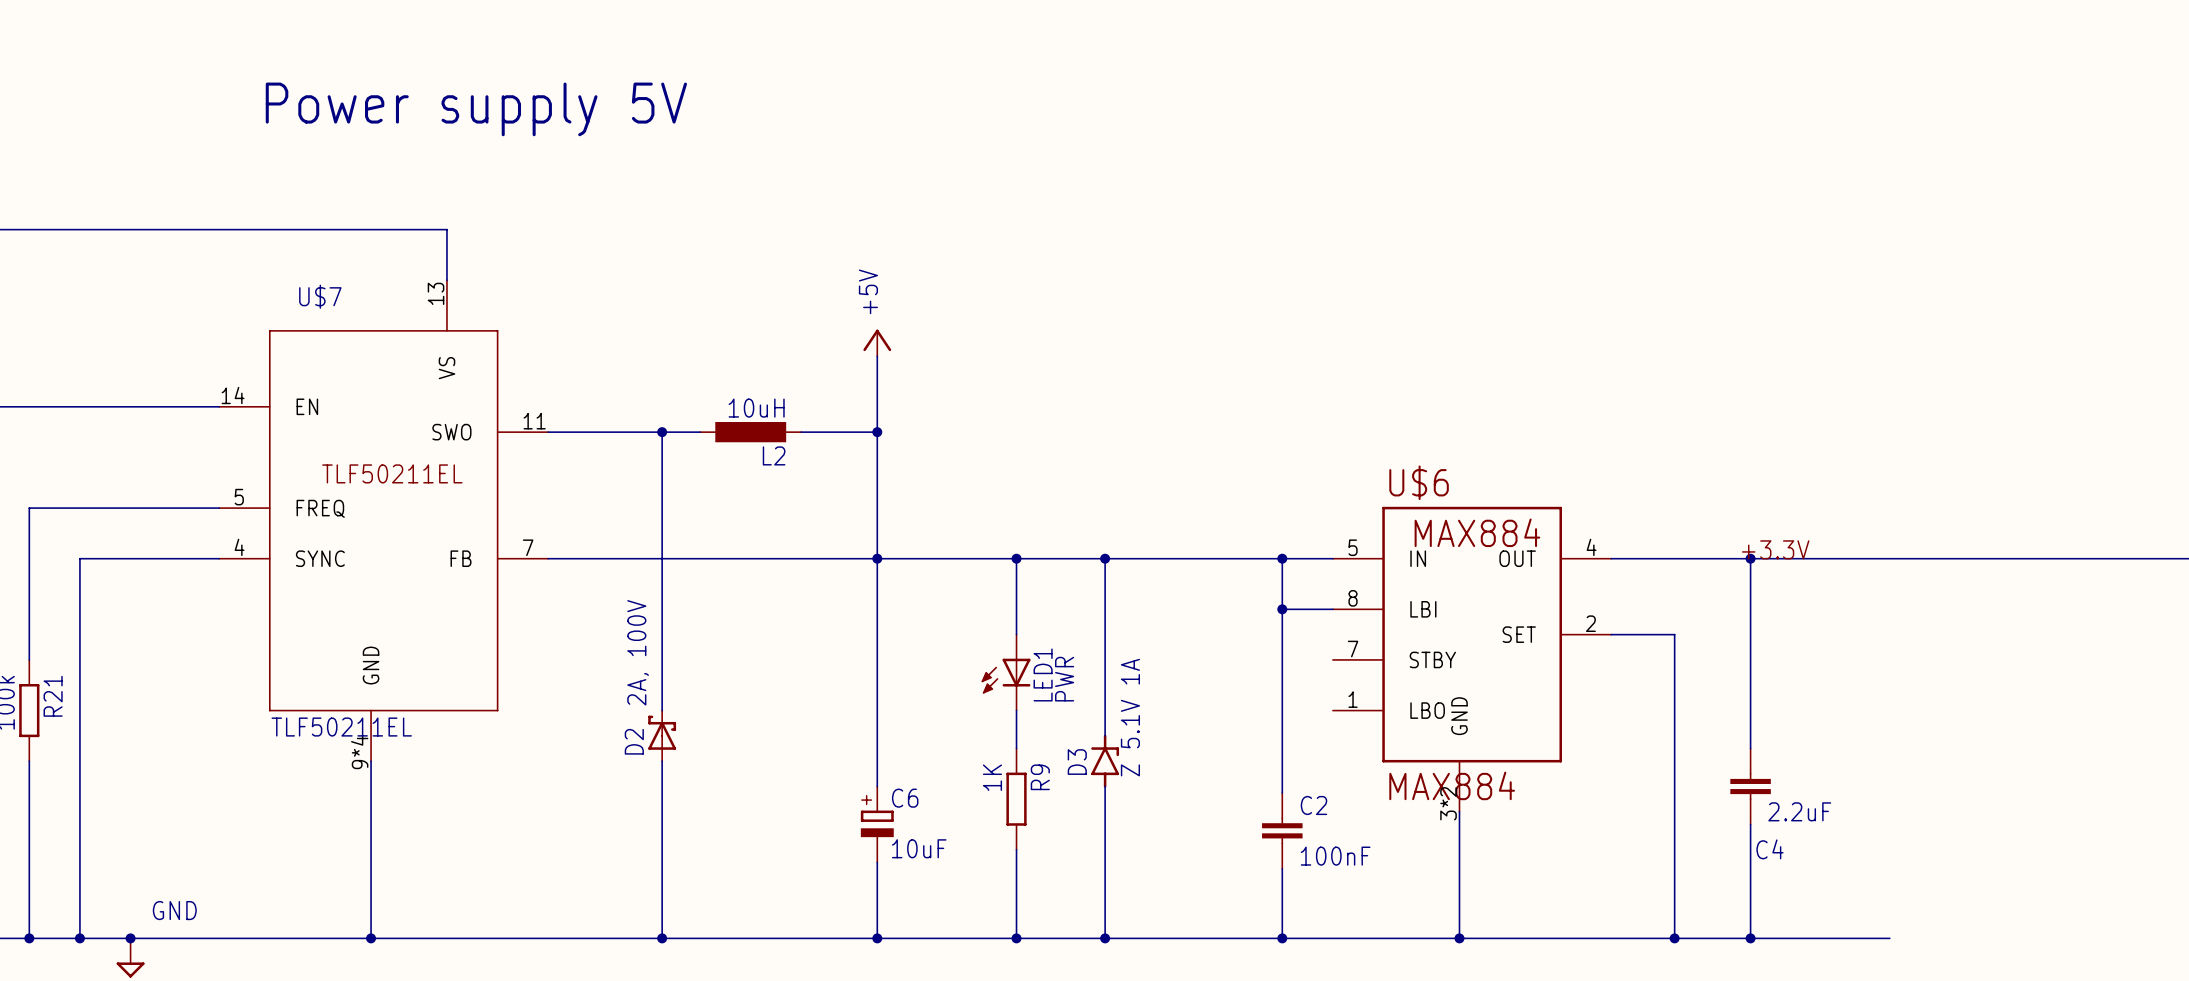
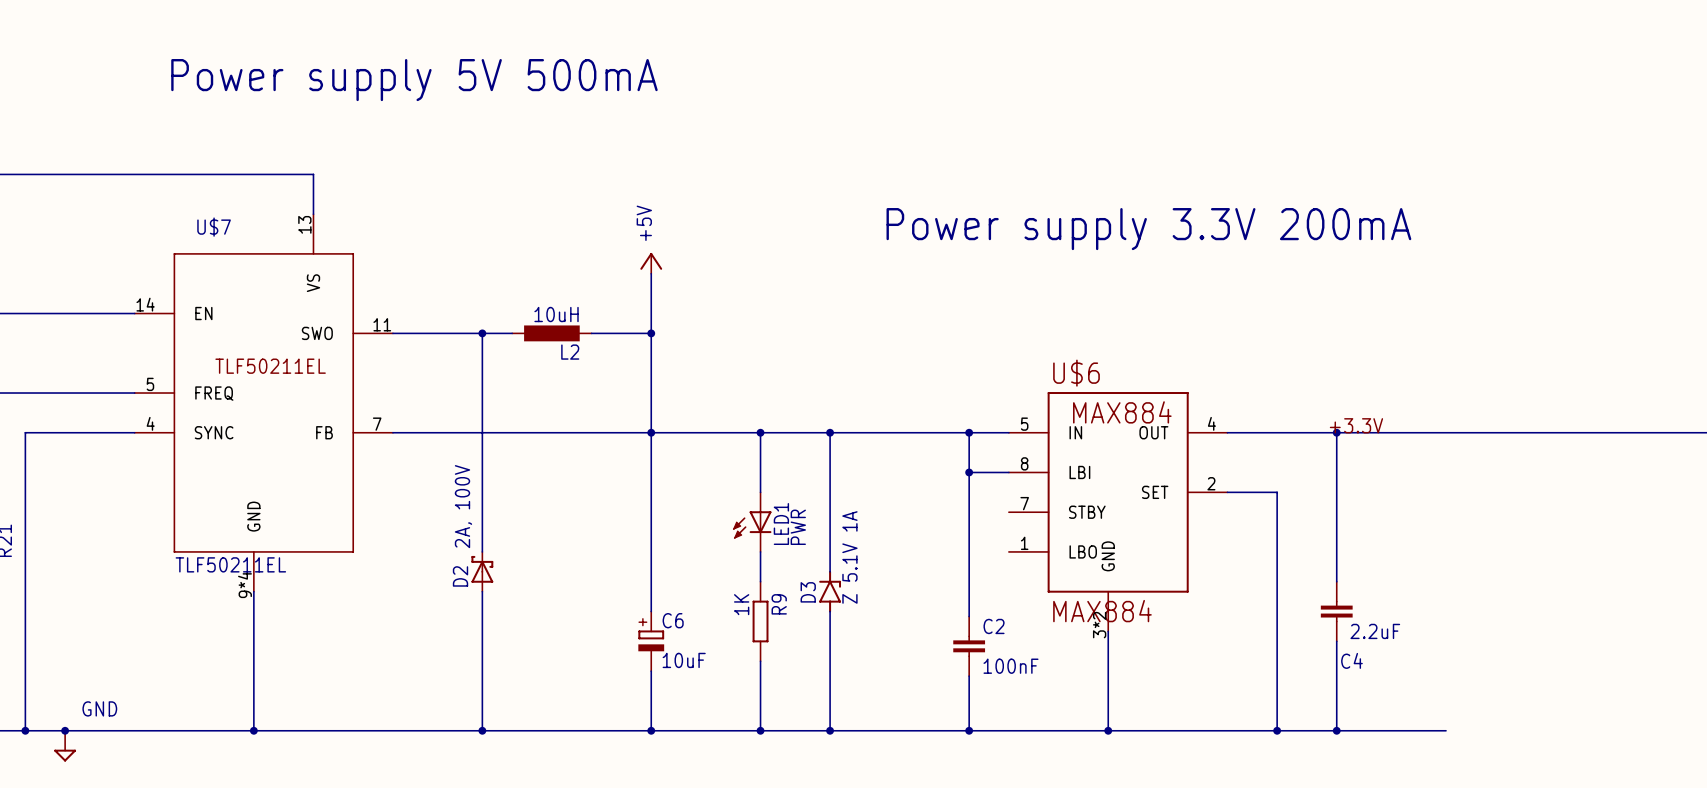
text: Power supply 5V (476, 109) -> Power supply 5V 500mA (414, 80)
text: none -> Power supply 3.3V 200mA (1148, 229)

